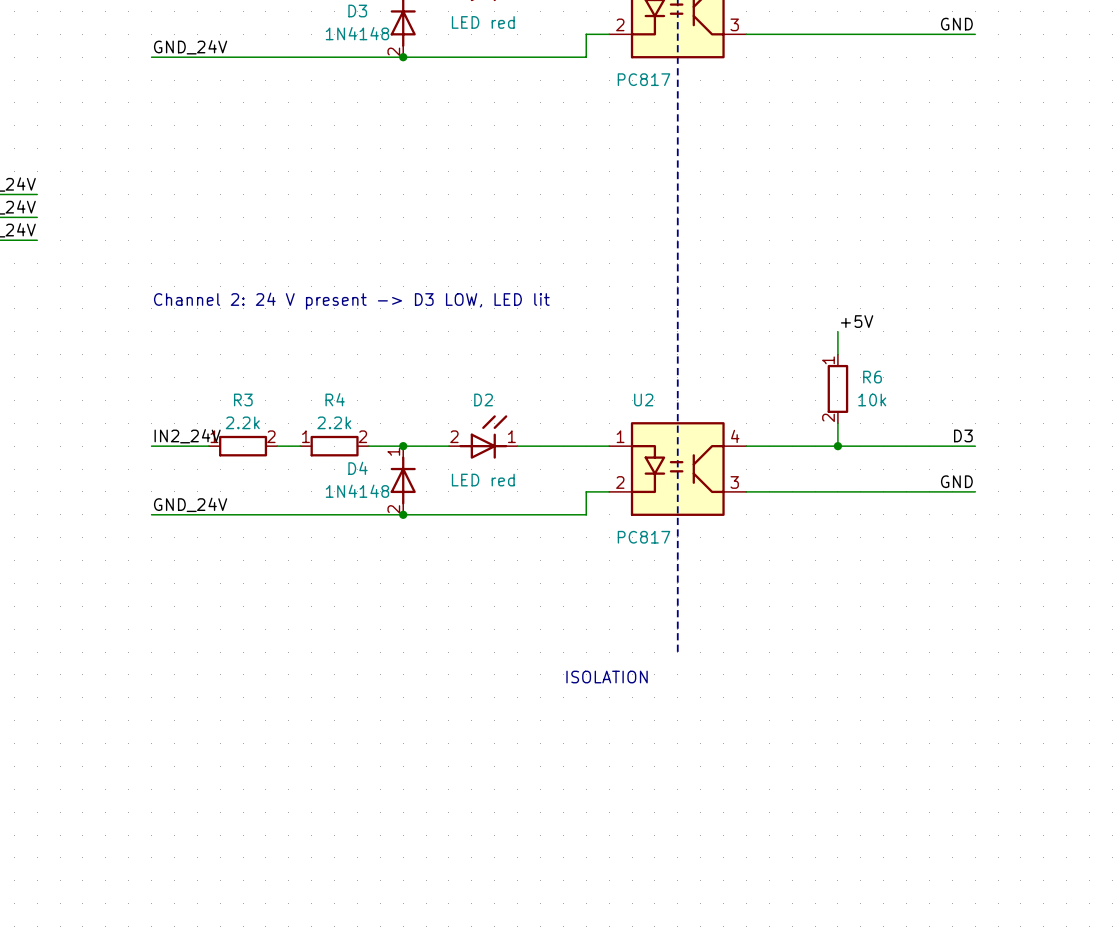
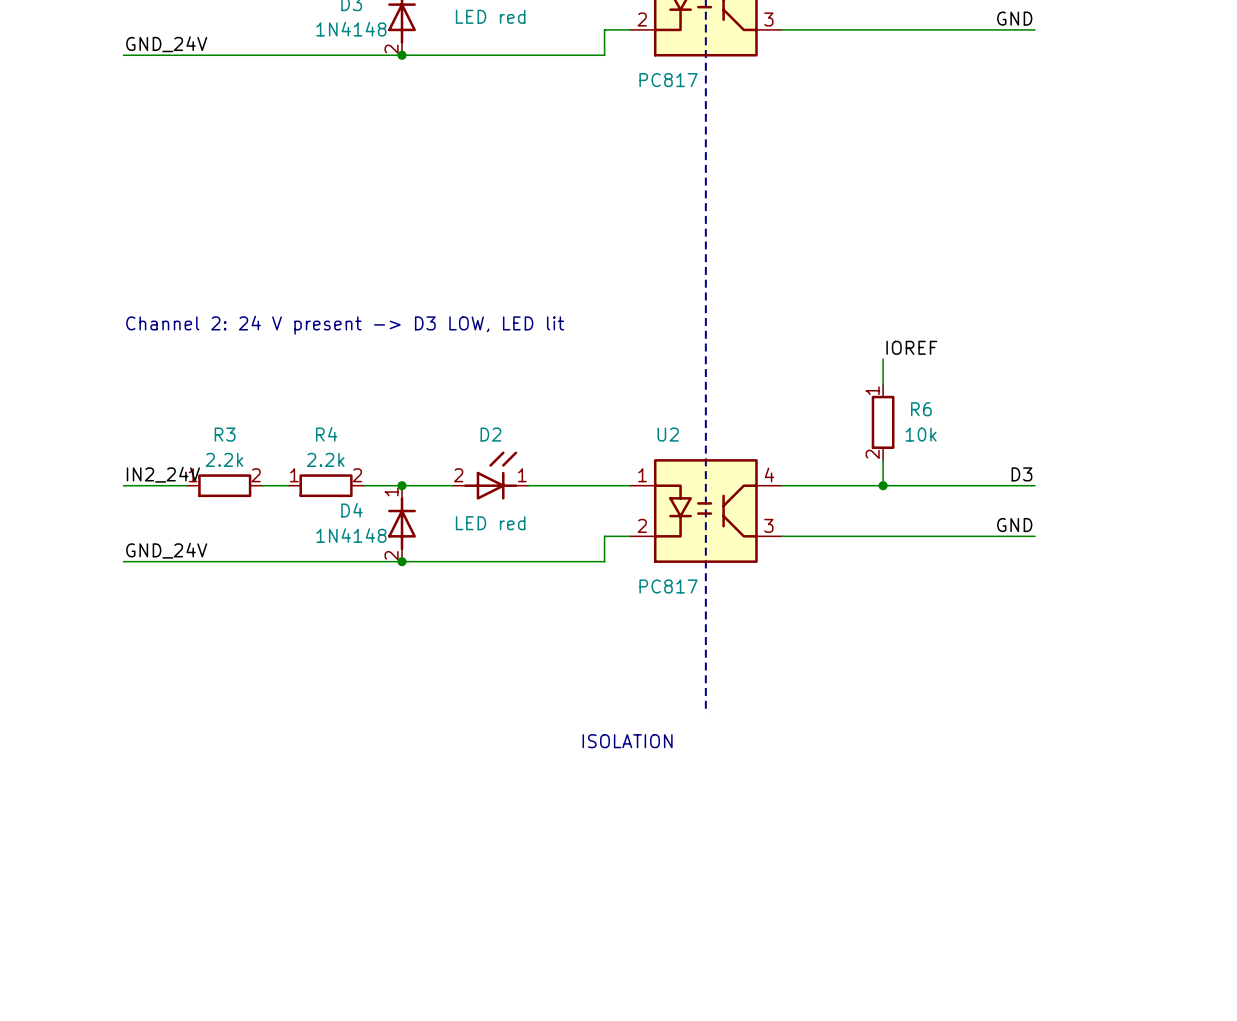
label: +5V (857, 321) -> IOREF (911, 347)

